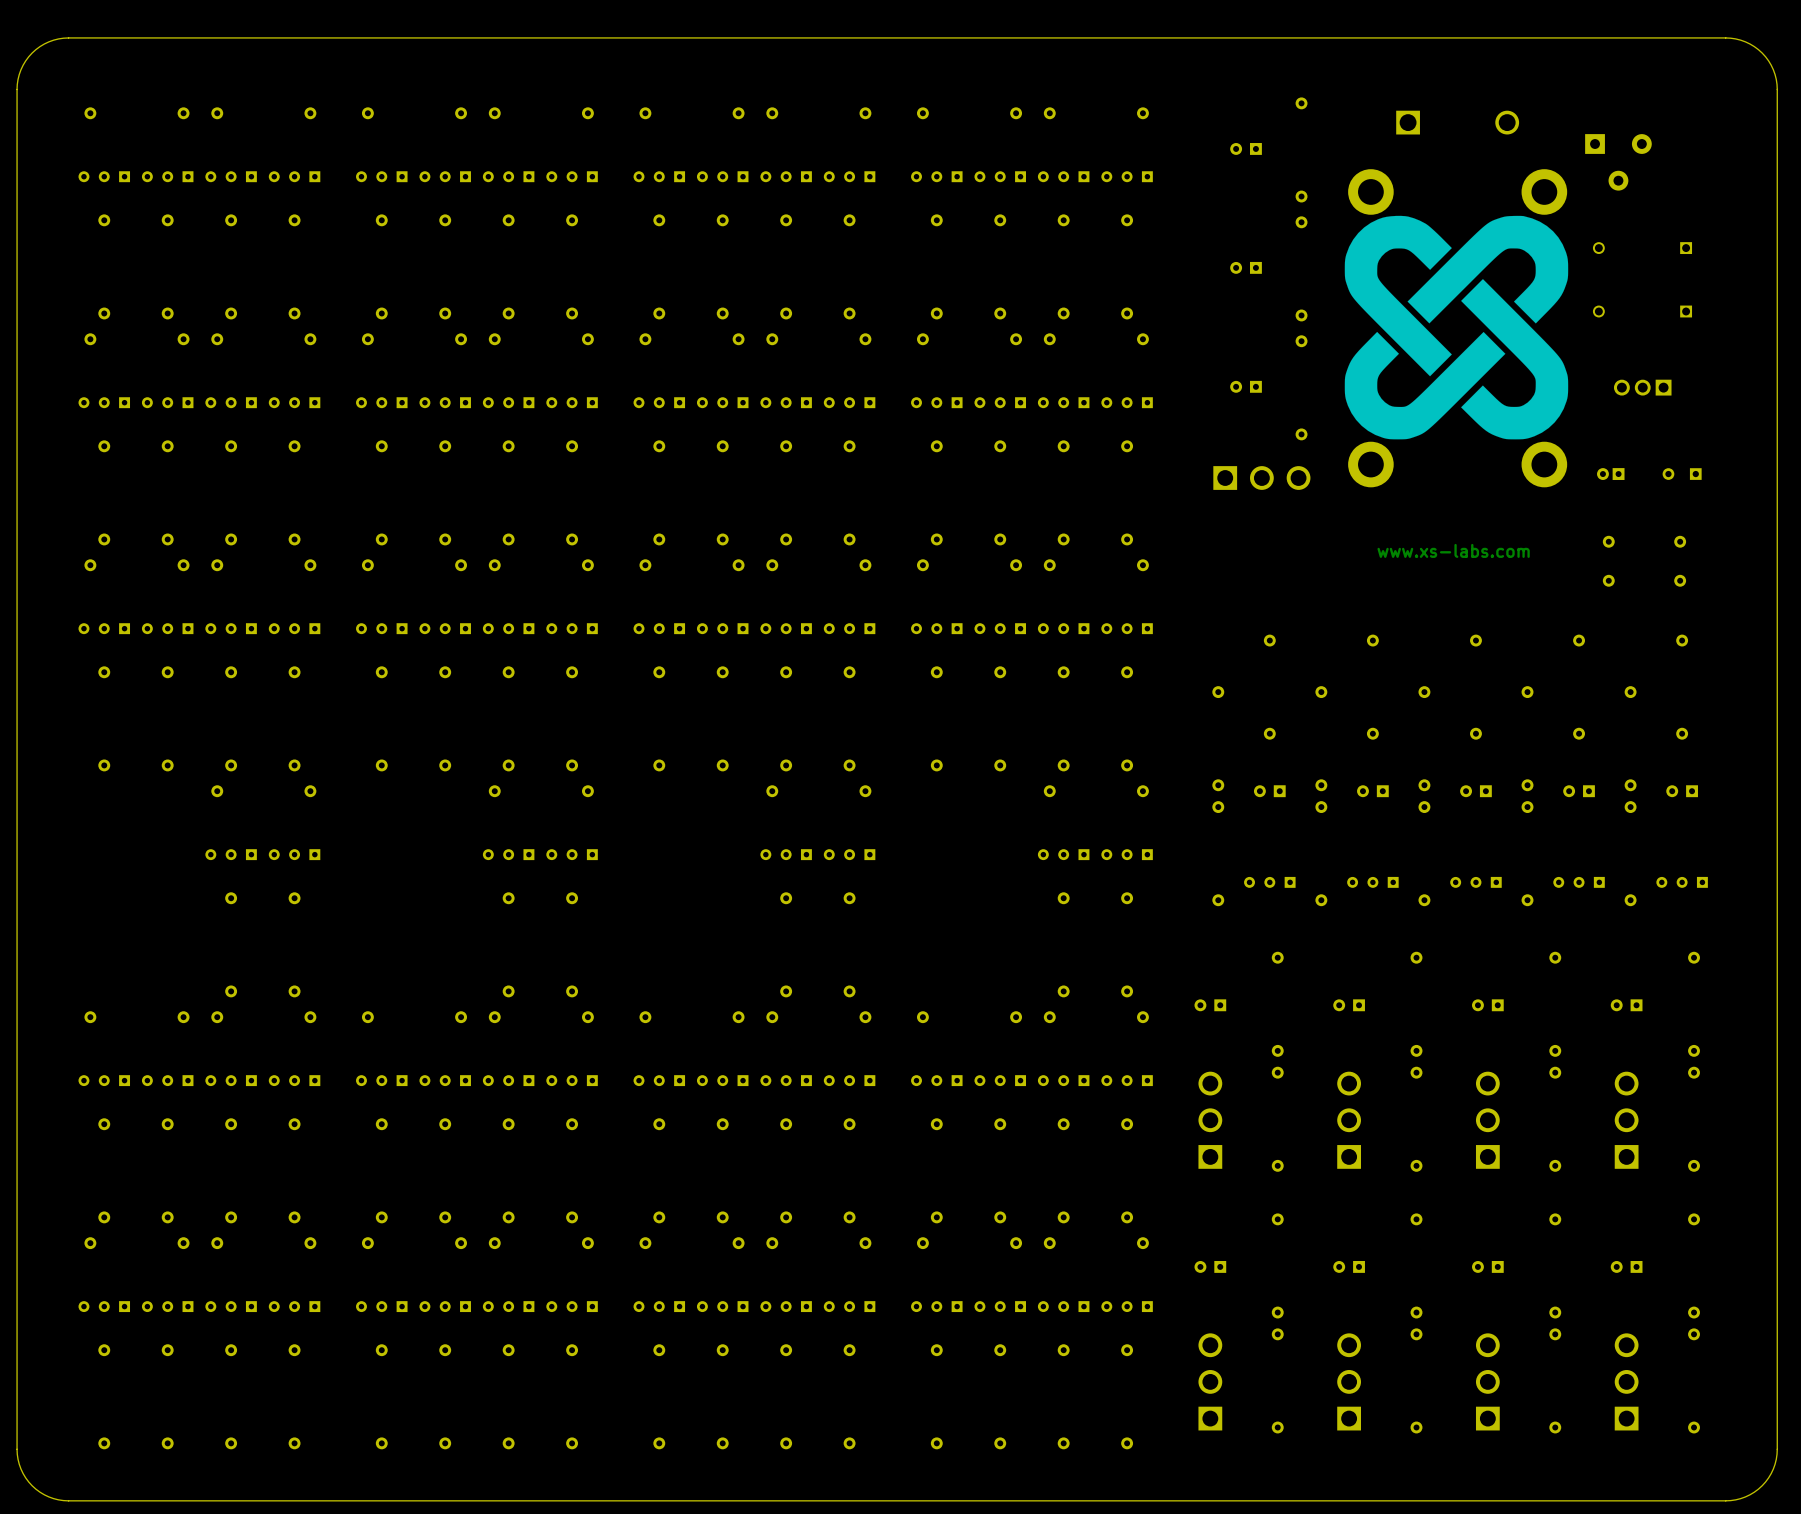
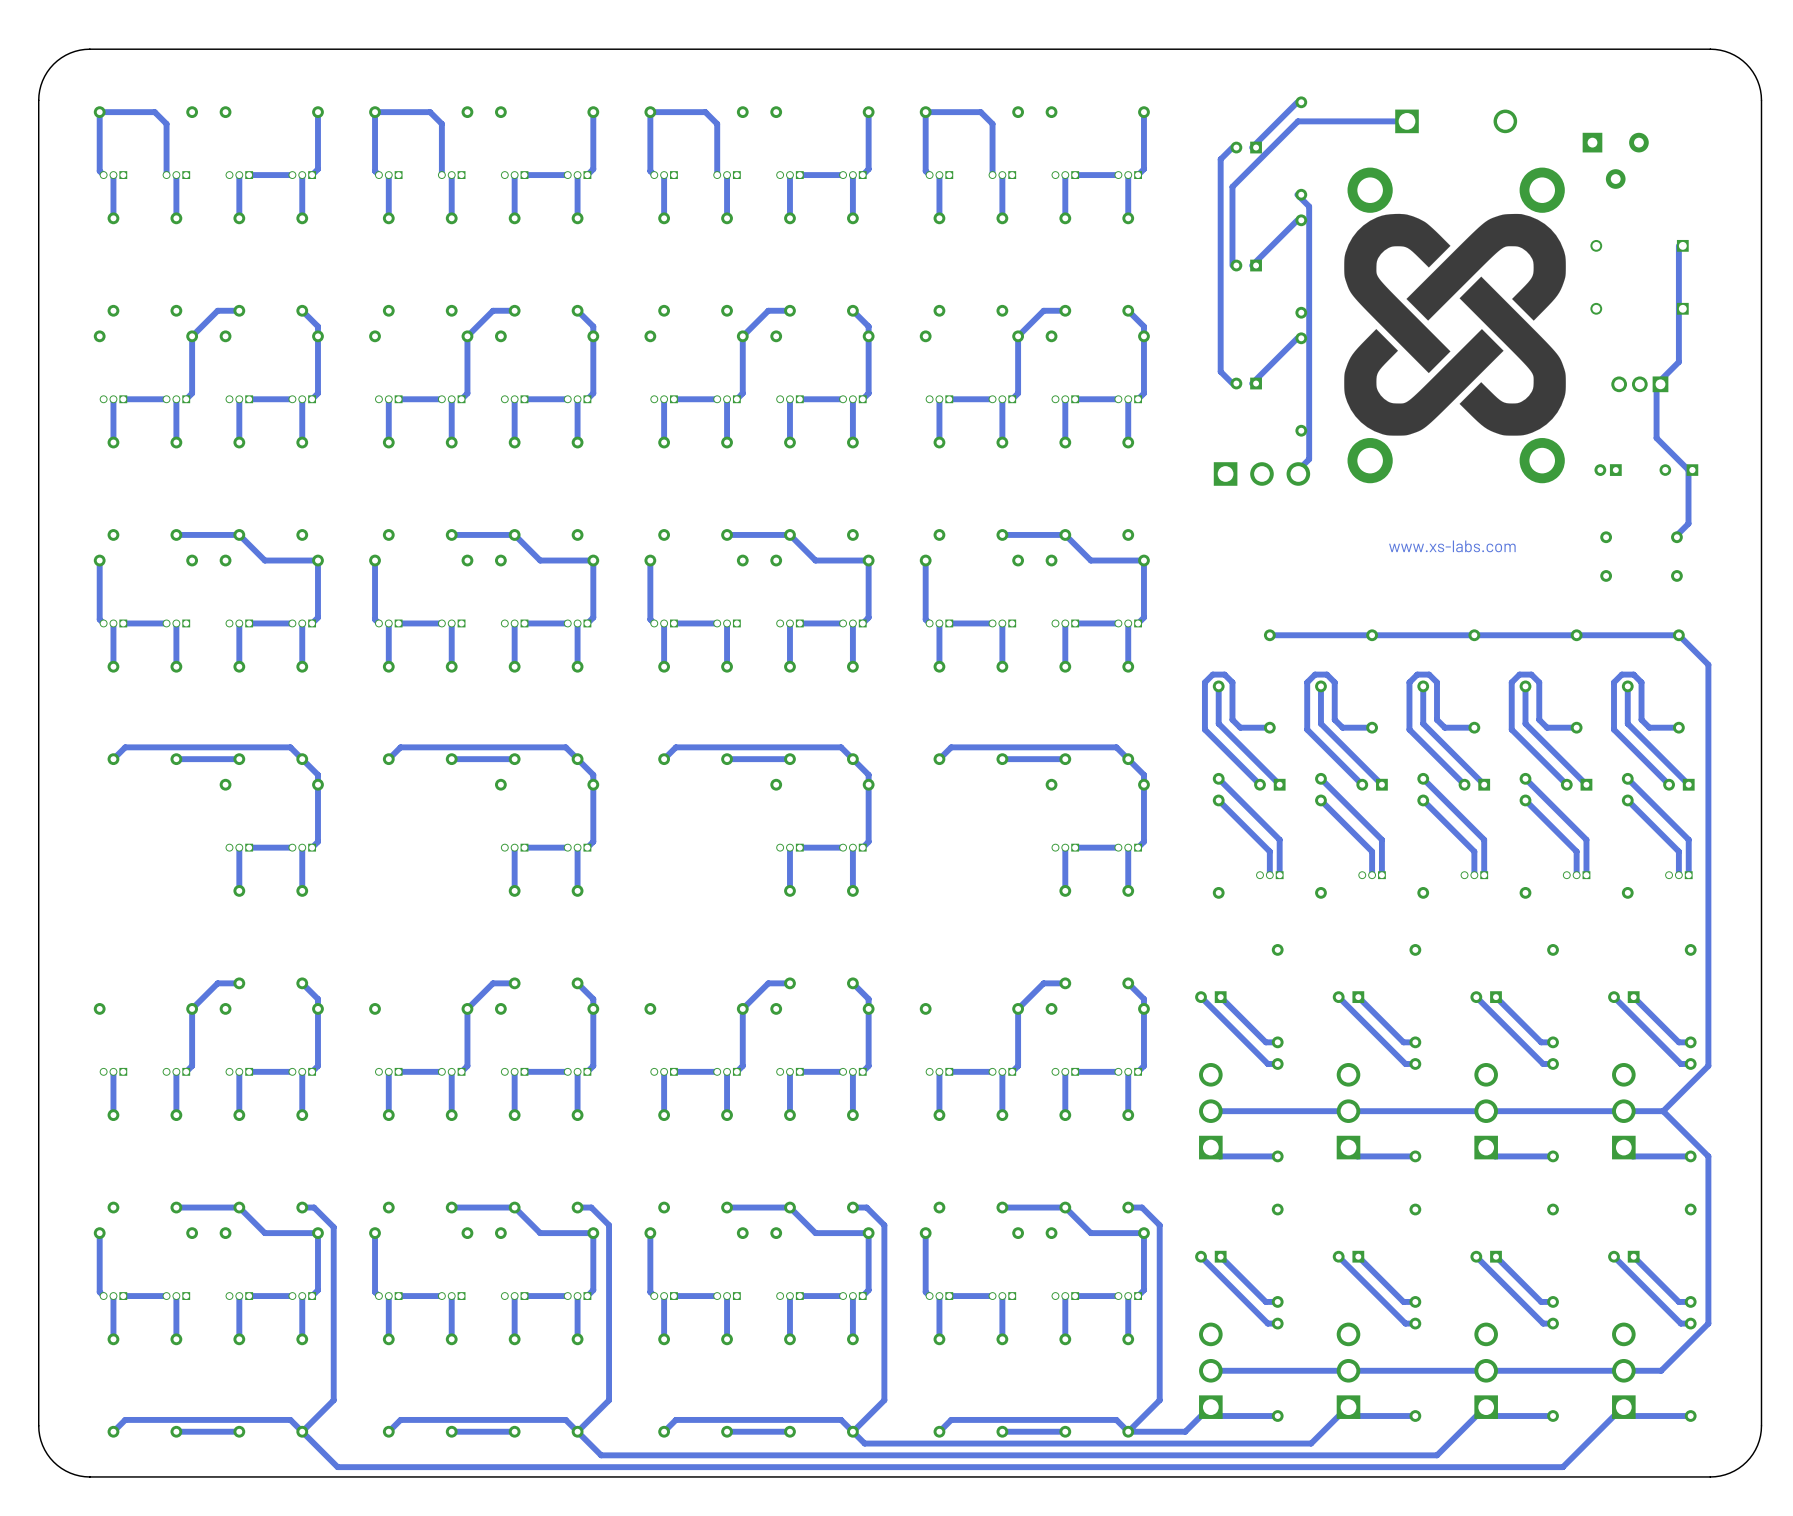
board edge: (1725, 37) (68, 37) (48, 41) (35, 49) (23, 65) (17, 89) (17, 1449) (20, 1469) (28, 1482) (48, 1496) (68, 1500) (1725, 1500) (1745, 1496) (1758, 1489) (1771, 1473) (1777, 1449) (1777, 89) (1773, 69) (1762, 53) (1745, 41) (1725, 37) -> (1710, 49) (1729, 53) (1746, 64) (1757, 80) (1761, 100) (1761, 1425) (1755, 1449) (1742, 1465) (1729, 1473) (1710, 1476) (89, 1476) (65, 1470) (50, 1458) (42, 1445) (38, 1425) (38, 100) (42, 80) (57, 60) (75, 51) (89, 49) (1710, 49)
track: none -> (1297, 102) (1252, 147)
track: none -> (317, 112) (317, 169) (312, 175)
track: none -> (593, 112) (593, 169) (587, 175)
track: none -> (868, 112) (868, 169) (862, 175)
track: none -> (1143, 112) (1143, 169) (1138, 175)
track: none -> (1403, 121) (1297, 121) (1232, 186) (1232, 265)
track: none -> (1232, 147) (1220, 159) (1220, 371) (1232, 383)
part footprint: [78, 171, 131, 183] -> [99, 171, 128, 180]
part footprint: [141, 171, 194, 183] -> [162, 171, 191, 180]
part footprint: [205, 171, 257, 183] -> [225, 171, 254, 180]
part footprint: [268, 171, 321, 183] -> [288, 171, 317, 180]
part footprint: [356, 171, 408, 183] -> [375, 171, 403, 180]
part footprint: [419, 171, 471, 183] -> [437, 171, 466, 180]
part footprint: [482, 171, 535, 183] -> [500, 171, 529, 180]
part footprint: [546, 171, 598, 183] -> [563, 171, 592, 180]
part footprint: [633, 171, 686, 183] -> [650, 171, 678, 180]
part footprint: [696, 171, 749, 183] -> [713, 171, 741, 180]
part footprint: [760, 171, 812, 183] -> [776, 171, 804, 180]
part footprint: [823, 171, 876, 183] -> [839, 171, 867, 180]
part footprint: [911, 171, 963, 183] -> [925, 171, 954, 180]
part footprint: [974, 171, 1026, 183] -> [988, 171, 1017, 180]
part footprint: [1037, 171, 1090, 183] -> [1051, 171, 1080, 180]
part footprint: [1101, 171, 1153, 183] -> [1114, 171, 1143, 180]
track: none -> (113, 175) (113, 218)
track: none -> (166, 175) (166, 123) (154, 112) (99, 112) (99, 171) (103, 175)
track: none -> (176, 175) (176, 218)
track: none -> (239, 175) (239, 218)
track: none -> (292, 175) (249, 175)
track: none -> (302, 175) (302, 218)
track: none -> (388, 175) (388, 218)
track: none -> (441, 175) (441, 123) (430, 112) (375, 112) (375, 171) (378, 175)
track: none -> (451, 175) (451, 218)
track: none -> (514, 175) (514, 218)
track: none -> (567, 175) (524, 175)
track: none -> (577, 175) (577, 218)
track: none -> (664, 175) (664, 218)
track: none -> (717, 175) (717, 123) (705, 112) (650, 112) (650, 171) (654, 175)
track: none -> (727, 175) (727, 218)
track: none -> (789, 175) (789, 218)
track: none -> (843, 175) (799, 175)
track: none -> (852, 175) (852, 218)
track: none -> (939, 175) (939, 218)
track: none -> (992, 175) (992, 123) (980, 112) (925, 112) (925, 171) (929, 175)
track: none -> (1002, 175) (1002, 218)
track: none -> (1065, 175) (1065, 218)
track: none -> (1118, 175) (1075, 175)
track: none -> (1128, 175) (1128, 218)
track: none -> (1297, 194) (1309, 206) (1309, 459) (1294, 473)
track: none -> (1297, 220) (1252, 265)
track: none -> (1678, 245) (1678, 361) (1656, 384) (1656, 438) (1688, 470) (1688, 523) (1674, 537)
track: none -> (239, 310) (217, 310) (192, 336) (192, 393) (186, 399)
track: none -> (302, 310) (317, 326) (317, 393) (312, 399)
track: none -> (514, 310) (493, 310) (467, 336) (467, 393) (461, 399)
track: none -> (577, 310) (593, 326) (593, 393) (587, 399)
track: none -> (789, 310) (768, 310) (742, 336) (742, 393) (736, 399)
track: none -> (852, 310) (868, 326) (868, 393) (862, 399)
track: none -> (1065, 310) (1043, 310) (1018, 336) (1018, 393) (1012, 399)
track: none -> (1128, 310) (1143, 326) (1143, 393) (1138, 399)
track: none -> (1297, 338) (1252, 383)
part footprint: [78, 397, 131, 409] -> [99, 395, 128, 404]
part footprint: [141, 397, 194, 409] -> [162, 395, 191, 404]
part footprint: [205, 397, 257, 409] -> [225, 395, 254, 404]
part footprint: [268, 397, 321, 409] -> [288, 395, 317, 404]
part footprint: [356, 397, 408, 409] -> [375, 395, 403, 404]
part footprint: [419, 397, 471, 409] -> [437, 395, 466, 404]
part footprint: [482, 397, 535, 409] -> [500, 395, 529, 404]
part footprint: [546, 397, 598, 409] -> [563, 395, 592, 404]
part footprint: [633, 397, 686, 409] -> [650, 395, 678, 404]
part footprint: [696, 397, 749, 409] -> [713, 395, 741, 404]
part footprint: [760, 397, 812, 409] -> [776, 395, 804, 404]
part footprint: [823, 397, 876, 409] -> [839, 395, 867, 404]
part footprint: [911, 397, 963, 409] -> [925, 395, 954, 404]
part footprint: [974, 397, 1026, 409] -> [988, 395, 1017, 404]
part footprint: [1037, 397, 1090, 409] -> [1051, 395, 1080, 404]
part footprint: [1101, 397, 1153, 409] -> [1114, 395, 1143, 404]
track: none -> (113, 399) (113, 442)
track: none -> (166, 399) (123, 399)
track: none -> (176, 399) (176, 442)
track: none -> (239, 399) (239, 442)
track: none -> (292, 399) (249, 399)
track: none -> (302, 399) (302, 442)
track: none -> (388, 399) (388, 442)
track: none -> (441, 399) (398, 399)
track: none -> (451, 399) (451, 442)
track: none -> (514, 399) (514, 442)
track: none -> (567, 399) (524, 399)
track: none -> (577, 399) (577, 442)
track: none -> (664, 399) (664, 442)
track: none -> (717, 399) (673, 399)
track: none -> (727, 399) (727, 442)
track: none -> (789, 399) (789, 442)
track: none -> (843, 399) (799, 399)
track: none -> (852, 399) (852, 442)
track: none -> (939, 399) (939, 442)
track: none -> (992, 399) (949, 399)
track: none -> (1002, 399) (1002, 442)
track: none -> (1065, 399) (1065, 442)
track: none -> (1118, 399) (1075, 399)
track: none -> (1128, 399) (1128, 442)
track: none -> (176, 534) (239, 534) (264, 560) (317, 560) (317, 617) (312, 623)
track: none -> (451, 534) (514, 534) (540, 560) (593, 560) (593, 617) (587, 623)
track: none -> (727, 534) (789, 534) (815, 560) (868, 560) (868, 617) (862, 623)
track: none -> (1002, 534) (1065, 534) (1090, 560) (1143, 560) (1143, 617) (1138, 623)
track: none -> (99, 560) (99, 619) (103, 623)
track: none -> (375, 560) (375, 619) (378, 623)
track: none -> (650, 560) (650, 619) (654, 623)
track: none -> (925, 560) (925, 619) (929, 623)
part footprint: [78, 623, 131, 635] -> [99, 619, 128, 628]
part footprint: [141, 623, 194, 635] -> [162, 619, 191, 628]
part footprint: [205, 623, 257, 635] -> [225, 619, 254, 628]
part footprint: [268, 623, 321, 635] -> [288, 619, 317, 628]
part footprint: [356, 623, 408, 635] -> [375, 619, 403, 628]
part footprint: [419, 623, 471, 635] -> [437, 619, 466, 628]
part footprint: [482, 623, 535, 635] -> [500, 619, 529, 628]
part footprint: [546, 623, 598, 635] -> [563, 619, 592, 628]
part footprint: [633, 623, 686, 635] -> [650, 619, 678, 628]
part footprint: [696, 623, 749, 635] -> [713, 619, 741, 628]
part footprint: [760, 623, 812, 635] -> [776, 619, 804, 628]
part footprint: [823, 623, 876, 635] -> [839, 619, 867, 628]
part footprint: [911, 623, 963, 635] -> [925, 619, 954, 628]
part footprint: [974, 623, 1026, 635] -> [988, 619, 1017, 628]
part footprint: [1037, 623, 1090, 635] -> [1051, 619, 1080, 628]
part footprint: [1101, 623, 1153, 635] -> [1114, 619, 1143, 628]
track: none -> (113, 623) (113, 666)
track: none -> (166, 623) (123, 623)
track: none -> (176, 623) (176, 666)
track: none -> (239, 623) (239, 666)
track: none -> (292, 623) (249, 623)
track: none -> (302, 623) (302, 666)
track: none -> (388, 623) (388, 666)
track: none -> (441, 623) (398, 623)
track: none -> (451, 623) (451, 666)
track: none -> (514, 623) (514, 666)
track: none -> (567, 623) (524, 623)
track: none -> (577, 623) (577, 666)
track: none -> (664, 623) (664, 666)
track: none -> (717, 623) (673, 623)
track: none -> (727, 623) (727, 666)
track: none -> (789, 623) (789, 666)
track: none -> (843, 623) (799, 623)
track: none -> (852, 623) (852, 666)
track: none -> (939, 623) (939, 666)
track: none -> (992, 623) (949, 623)
track: none -> (1002, 623) (1002, 666)
track: none -> (1065, 623) (1065, 666)
track: none -> (1118, 623) (1075, 623)
track: none -> (1128, 623) (1128, 666)
track: none -> (1269, 635) (1678, 635) (1708, 664) (1708, 1065) (1663, 1111)
track: none -> (1218, 686) (1218, 723) (1279, 784)
track: none -> (1320, 686) (1320, 723) (1381, 784)
track: none -> (1423, 686) (1423, 723) (1484, 784)
track: none -> (1525, 686) (1525, 723) (1586, 784)
track: none -> (1627, 686) (1627, 723) (1688, 784)
track: none -> (1269, 727) (1240, 727) (1232, 719) (1232, 682) (1224, 674) (1212, 674) (1204, 682) (1204, 729) (1260, 784)
track: none -> (1372, 727) (1342, 727) (1334, 719) (1334, 682) (1326, 674) (1315, 674) (1307, 682) (1307, 729) (1362, 784)
track: none -> (1474, 727) (1444, 727) (1437, 719) (1437, 682) (1429, 674) (1417, 674) (1409, 682) (1409, 729) (1464, 784)
track: none -> (1576, 727) (1547, 727) (1539, 719) (1539, 682) (1531, 674) (1519, 674) (1511, 682) (1511, 729) (1566, 784)
track: none -> (1678, 727) (1649, 727) (1641, 719) (1641, 682) (1633, 674) (1621, 674) (1613, 682) (1613, 729) (1669, 784)
track: none -> (113, 759) (125, 747) (290, 747) (317, 774) (317, 841) (312, 847)
track: none -> (239, 759) (176, 759)
track: none -> (388, 759) (400, 747) (565, 747) (593, 774) (593, 841) (587, 847)
track: none -> (514, 759) (451, 759)
track: none -> (664, 759) (675, 747) (841, 747) (868, 774) (868, 841) (862, 847)
track: none -> (789, 759) (727, 759)
track: none -> (939, 759) (951, 747) (1116, 747) (1143, 774) (1143, 841) (1138, 847)
track: none -> (1065, 759) (1002, 759)
track: none -> (1218, 778) (1279, 839) (1279, 875)
track: none -> (1320, 778) (1381, 839) (1381, 875)
track: none -> (1423, 778) (1484, 839) (1484, 875)
track: none -> (1525, 778) (1586, 839) (1586, 875)
track: none -> (1627, 778) (1688, 839) (1688, 875)
track: none -> (1218, 800) (1269, 851) (1269, 875)
track: none -> (1320, 800) (1372, 851) (1372, 875)
track: none -> (1423, 800) (1474, 851) (1474, 875)
track: none -> (1525, 800) (1576, 851) (1576, 875)
track: none -> (1627, 800) (1678, 851) (1678, 875)
part footprint: [205, 849, 257, 861] -> [225, 843, 254, 852]
part footprint: [268, 849, 321, 861] -> [288, 843, 317, 852]
part footprint: [482, 849, 535, 861] -> [500, 843, 529, 852]
part footprint: [546, 849, 598, 861] -> [563, 843, 592, 852]
part footprint: [760, 849, 812, 861] -> [776, 843, 804, 852]
part footprint: [823, 849, 876, 861] -> [839, 843, 867, 852]
part footprint: [1037, 849, 1090, 861] -> [1051, 843, 1080, 852]
part footprint: [1101, 849, 1153, 861] -> [1114, 843, 1143, 852]
track: none -> (239, 847) (239, 890)
track: none -> (292, 847) (249, 847)
track: none -> (302, 847) (302, 890)
track: none -> (514, 847) (514, 890)
track: none -> (567, 847) (524, 847)
track: none -> (577, 847) (577, 890)
track: none -> (789, 847) (789, 890)
track: none -> (843, 847) (799, 847)
track: none -> (852, 847) (852, 890)
track: none -> (1065, 847) (1065, 890)
track: none -> (1118, 847) (1075, 847)
track: none -> (1128, 847) (1128, 890)
part footprint: [1244, 876, 1296, 888] -> [1256, 871, 1284, 880]
part footprint: [1347, 876, 1399, 888] -> [1358, 871, 1386, 880]
part footprint: [1450, 876, 1502, 888] -> [1460, 871, 1489, 880]
part footprint: [1553, 876, 1605, 888] -> [1562, 871, 1591, 880]
part footprint: [1656, 876, 1708, 888] -> [1665, 871, 1693, 880]
track: none -> (239, 983) (217, 983) (192, 1008) (192, 1065) (186, 1071)
track: none -> (302, 983) (317, 999) (317, 1065) (312, 1071)
track: none -> (514, 983) (493, 983) (467, 1008) (467, 1065) (461, 1071)
track: none -> (577, 983) (593, 999) (593, 1065) (587, 1071)
track: none -> (789, 983) (768, 983) (742, 1008) (742, 1065) (736, 1071)
track: none -> (852, 983) (868, 999) (868, 1065) (862, 1071)
track: none -> (1065, 983) (1043, 983) (1018, 1008) (1018, 1065) (1012, 1071)
track: none -> (1128, 983) (1143, 999) (1143, 1065) (1138, 1071)
track: none -> (1201, 997) (1267, 1063) (1277, 1063)
track: none -> (1220, 997) (1265, 1042) (1277, 1042)
track: none -> (1338, 997) (1405, 1063) (1415, 1063)
track: none -> (1358, 997) (1403, 1042) (1415, 1042)
track: none -> (1476, 997) (1543, 1063) (1553, 1063)
track: none -> (1496, 997) (1541, 1042) (1553, 1042)
track: none -> (1613, 997) (1680, 1063) (1690, 1063)
track: none -> (1633, 997) (1678, 1042) (1690, 1042)
part footprint: [78, 1075, 131, 1087] -> [99, 1067, 128, 1076]
part footprint: [141, 1075, 194, 1087] -> [162, 1067, 191, 1076]
part footprint: [205, 1075, 257, 1087] -> [225, 1067, 254, 1076]
part footprint: [268, 1075, 321, 1087] -> [288, 1067, 317, 1076]
part footprint: [356, 1075, 408, 1087] -> [375, 1067, 403, 1076]
part footprint: [419, 1075, 471, 1087] -> [437, 1067, 466, 1076]
part footprint: [482, 1075, 535, 1087] -> [500, 1067, 529, 1076]
part footprint: [546, 1075, 598, 1087] -> [563, 1067, 592, 1076]
part footprint: [633, 1075, 686, 1087] -> [650, 1067, 678, 1076]
part footprint: [696, 1075, 749, 1087] -> [713, 1067, 741, 1076]
part footprint: [760, 1075, 812, 1087] -> [776, 1067, 804, 1076]
part footprint: [823, 1075, 876, 1087] -> [839, 1067, 867, 1076]
part footprint: [911, 1075, 963, 1087] -> [925, 1067, 954, 1076]
part footprint: [974, 1075, 1026, 1087] -> [988, 1067, 1017, 1076]
part footprint: [1037, 1075, 1090, 1087] -> [1051, 1067, 1080, 1076]
part footprint: [1101, 1075, 1153, 1087] -> [1114, 1067, 1143, 1076]
track: none -> (113, 1071) (113, 1115)
track: none -> (176, 1071) (176, 1115)
track: none -> (239, 1071) (239, 1115)
track: none -> (292, 1071) (249, 1071)
track: none -> (302, 1071) (302, 1115)
track: none -> (388, 1071) (388, 1115)
track: none -> (441, 1071) (398, 1071)
track: none -> (451, 1071) (451, 1115)
track: none -> (514, 1071) (514, 1115)
track: none -> (567, 1071) (524, 1071)
track: none -> (577, 1071) (577, 1115)
track: none -> (664, 1071) (664, 1115)
track: none -> (717, 1071) (673, 1071)
track: none -> (727, 1071) (727, 1115)
track: none -> (789, 1071) (789, 1115)
track: none -> (843, 1071) (799, 1071)
track: none -> (852, 1071) (852, 1115)
track: none -> (939, 1071) (939, 1115)
track: none -> (992, 1071) (949, 1071)
track: none -> (1002, 1071) (1002, 1115)
track: none -> (1065, 1071) (1065, 1115)
track: none -> (1118, 1071) (1075, 1071)
track: none -> (1128, 1071) (1128, 1115)
track: none -> (1663, 1111) (1210, 1111)
track: none -> (1663, 1111) (1708, 1156) (1708, 1323) (1661, 1370) (1210, 1370)
track: none -> (1210, 1147) (1219, 1156) (1277, 1156)
track: none -> (1348, 1147) (1357, 1156) (1415, 1156)
track: none -> (1486, 1147) (1495, 1156) (1553, 1156)
track: none -> (1623, 1147) (1632, 1156) (1690, 1156)
track: none -> (176, 1207) (239, 1207) (264, 1233) (317, 1233) (317, 1290) (312, 1296)
track: none -> (302, 1207) (314, 1207) (333, 1227) (333, 1400) (302, 1431)
track: none -> (451, 1207) (514, 1207) (540, 1233) (593, 1233) (593, 1290) (587, 1296)
track: none -> (577, 1207) (591, 1207) (609, 1225) (609, 1400) (577, 1431)
track: none -> (727, 1207) (789, 1207) (815, 1233) (868, 1233) (868, 1290) (862, 1296)
track: none -> (852, 1207) (866, 1207) (884, 1225) (884, 1400) (852, 1431)
track: none -> (1002, 1207) (1065, 1207) (1090, 1233) (1143, 1233) (1143, 1290) (1138, 1296)
track: none -> (1128, 1207) (1142, 1207) (1159, 1225) (1159, 1400) (1128, 1431)
track: none -> (99, 1233) (99, 1292) (103, 1296)
track: none -> (375, 1233) (375, 1292) (378, 1296)
track: none -> (650, 1233) (650, 1292) (654, 1296)
track: none -> (925, 1233) (925, 1292) (929, 1296)
track: none -> (1201, 1256) (1267, 1323) (1277, 1323)
track: none -> (1220, 1256) (1265, 1301) (1277, 1301)
track: none -> (1338, 1256) (1405, 1323) (1415, 1323)
track: none -> (1358, 1256) (1403, 1301) (1415, 1301)
track: none -> (1476, 1256) (1543, 1323) (1553, 1323)
track: none -> (1496, 1256) (1541, 1301) (1553, 1301)
track: none -> (1613, 1256) (1680, 1323) (1690, 1323)
track: none -> (1633, 1256) (1678, 1301) (1690, 1301)
part footprint: [78, 1301, 131, 1313] -> [99, 1292, 128, 1300]
part footprint: [141, 1301, 194, 1313] -> [162, 1292, 191, 1300]
part footprint: [205, 1301, 257, 1313] -> [225, 1292, 254, 1300]
part footprint: [268, 1301, 321, 1313] -> [288, 1292, 317, 1300]
part footprint: [356, 1301, 408, 1313] -> [375, 1292, 403, 1300]
part footprint: [419, 1301, 471, 1313] -> [437, 1292, 466, 1300]
part footprint: [482, 1301, 535, 1313] -> [500, 1292, 529, 1300]
part footprint: [546, 1301, 598, 1313] -> [563, 1292, 592, 1300]
part footprint: [633, 1301, 686, 1313] -> [650, 1292, 678, 1300]
part footprint: [696, 1301, 749, 1313] -> [713, 1292, 741, 1300]
part footprint: [760, 1301, 812, 1313] -> [776, 1292, 804, 1300]
part footprint: [823, 1301, 876, 1313] -> [839, 1292, 867, 1300]
part footprint: [911, 1301, 963, 1313] -> [925, 1292, 954, 1300]
part footprint: [974, 1301, 1026, 1313] -> [988, 1292, 1017, 1300]
part footprint: [1037, 1301, 1090, 1313] -> [1051, 1292, 1080, 1300]
part footprint: [1101, 1301, 1153, 1313] -> [1114, 1292, 1143, 1300]
track: none -> (113, 1296) (113, 1339)
track: none -> (166, 1296) (123, 1296)
track: none -> (176, 1296) (176, 1339)
track: none -> (239, 1296) (239, 1339)
track: none -> (292, 1296) (249, 1296)
track: none -> (302, 1296) (302, 1339)
track: none -> (388, 1296) (388, 1339)
track: none -> (441, 1296) (398, 1296)
track: none -> (451, 1296) (451, 1339)
track: none -> (514, 1296) (514, 1339)
track: none -> (567, 1296) (524, 1296)
track: none -> (577, 1296) (577, 1339)
track: none -> (664, 1296) (664, 1339)
track: none -> (717, 1296) (673, 1296)
track: none -> (727, 1296) (727, 1339)
track: none -> (789, 1296) (789, 1339)
track: none -> (843, 1296) (799, 1296)
track: none -> (852, 1296) (852, 1339)
track: none -> (939, 1296) (939, 1339)
track: none -> (992, 1296) (949, 1296)
track: none -> (1002, 1296) (1002, 1339)
track: none -> (1065, 1296) (1065, 1339)
track: none -> (1118, 1296) (1075, 1296)
track: none -> (1128, 1296) (1128, 1339)
track: none -> (1277, 1416) (1219, 1416) (1209, 1407) (1185, 1431) (1128, 1431)
track: none -> (1415, 1416) (1357, 1416) (1347, 1407) (1311, 1443) (864, 1443) (841, 1419) (675, 1419) (664, 1431)
track: none -> (1553, 1416) (1495, 1416) (1485, 1407) (1437, 1455) (601, 1455) (565, 1419) (400, 1419) (388, 1431)
track: none -> (1690, 1416) (1632, 1416) (1622, 1407) (1562, 1467) (337, 1467) (290, 1419) (125, 1419) (113, 1431)
track: none -> (239, 1431) (176, 1431)
track: none -> (514, 1431) (451, 1431)
track: none -> (789, 1431) (727, 1431)
track: none -> (1065, 1431) (1002, 1431)
track: none -> (1128, 1431) (1116, 1419) (951, 1419) (939, 1431)

